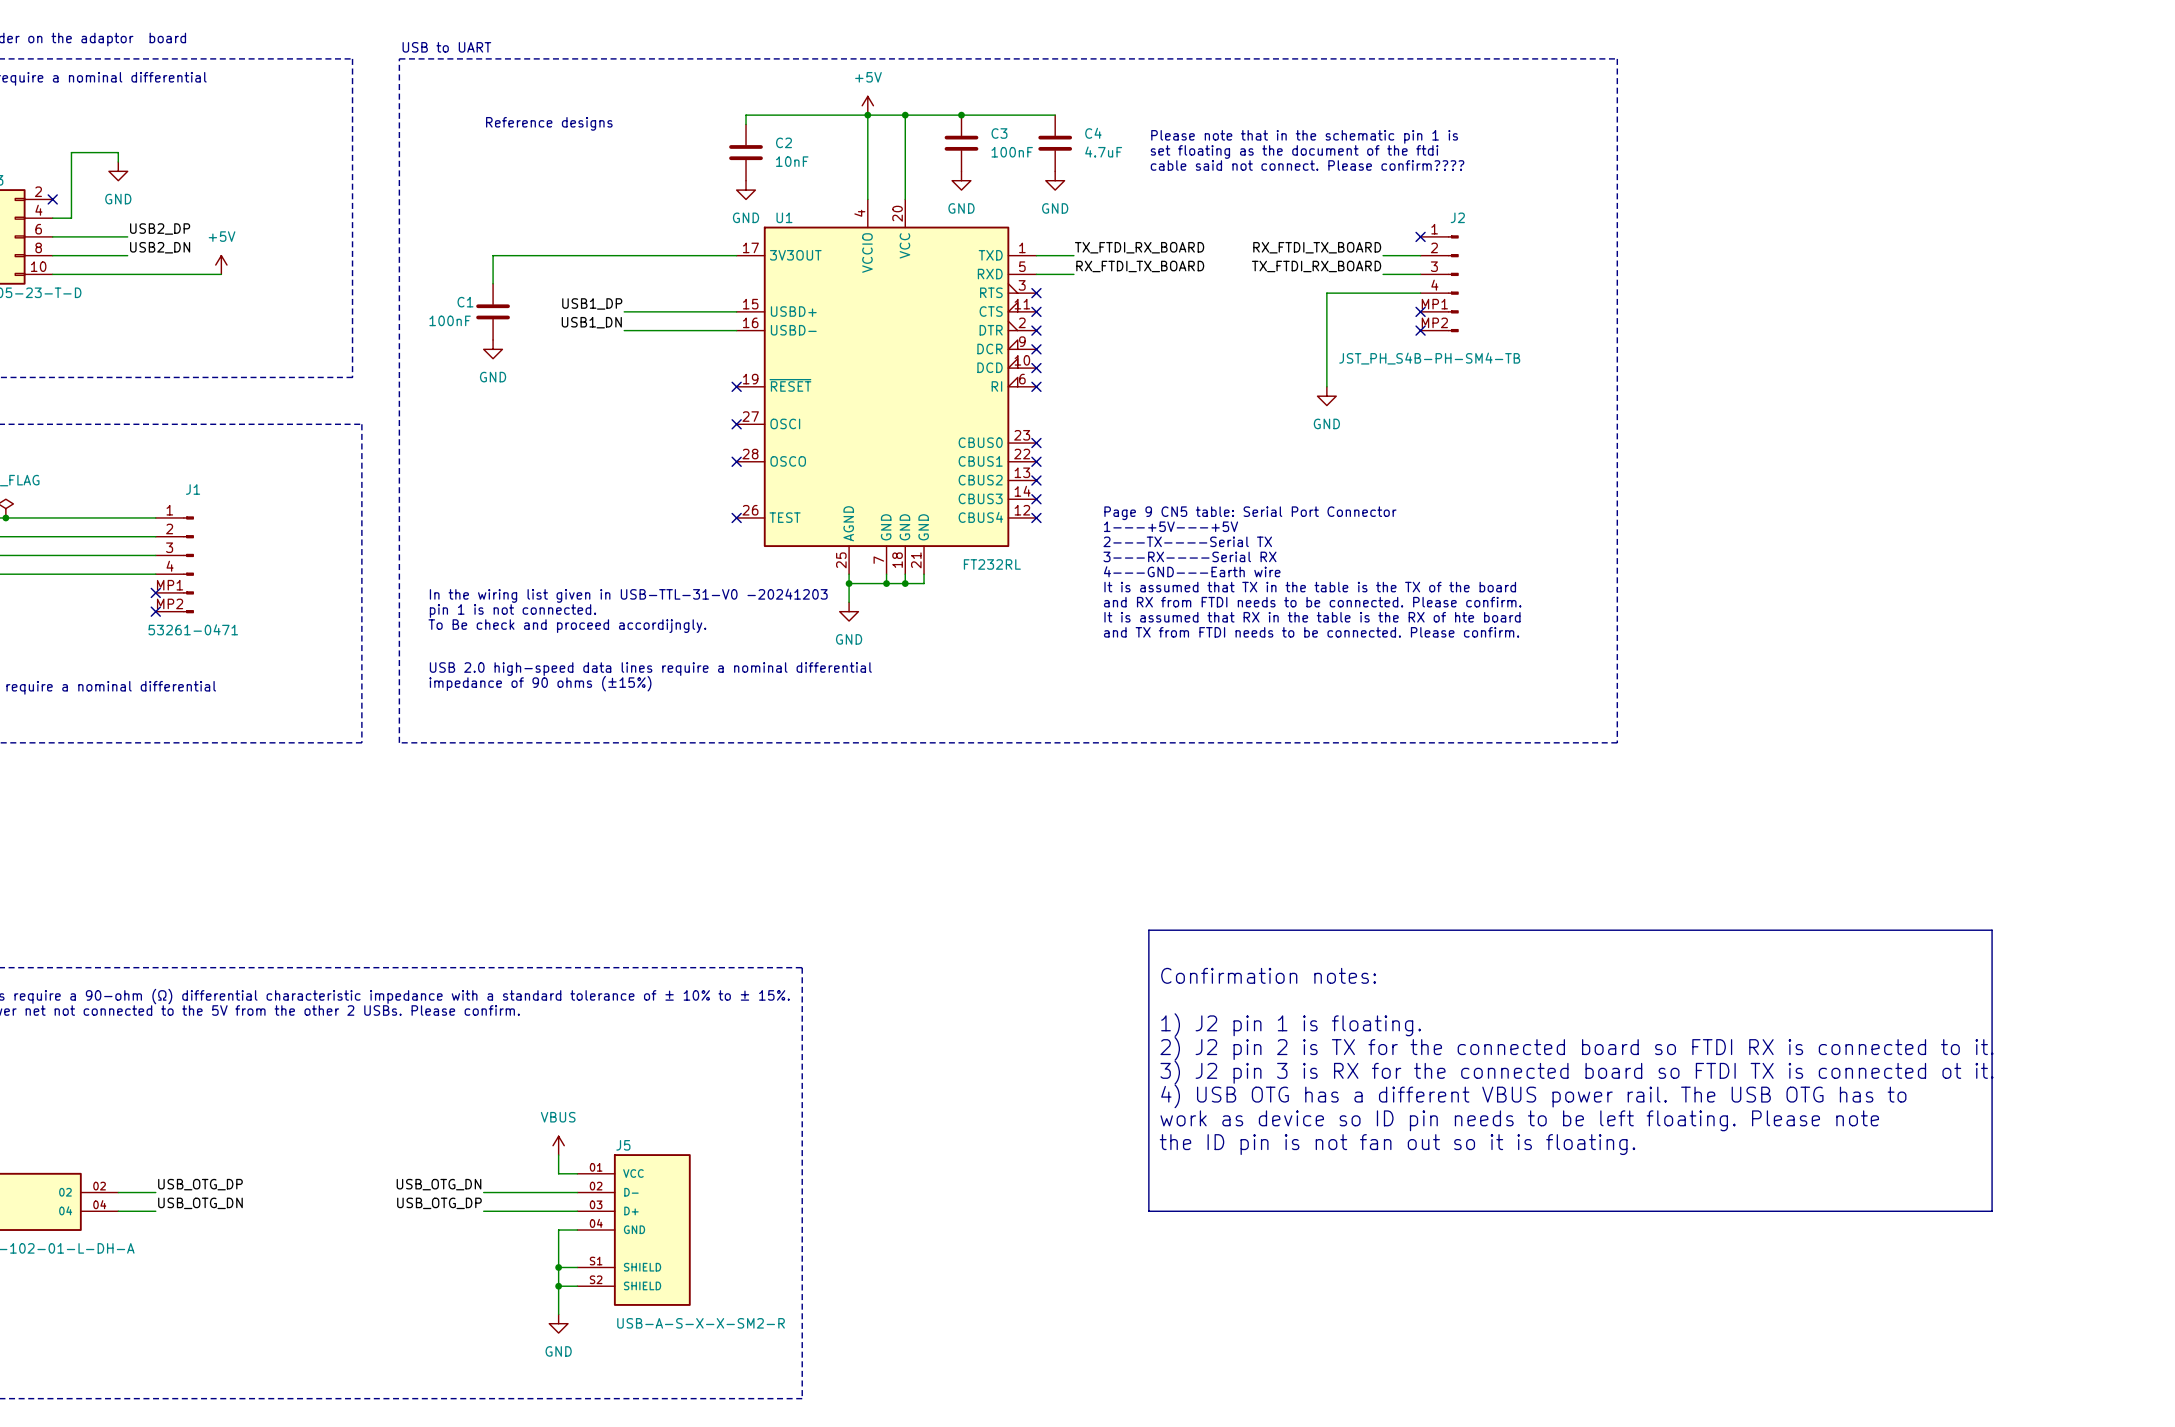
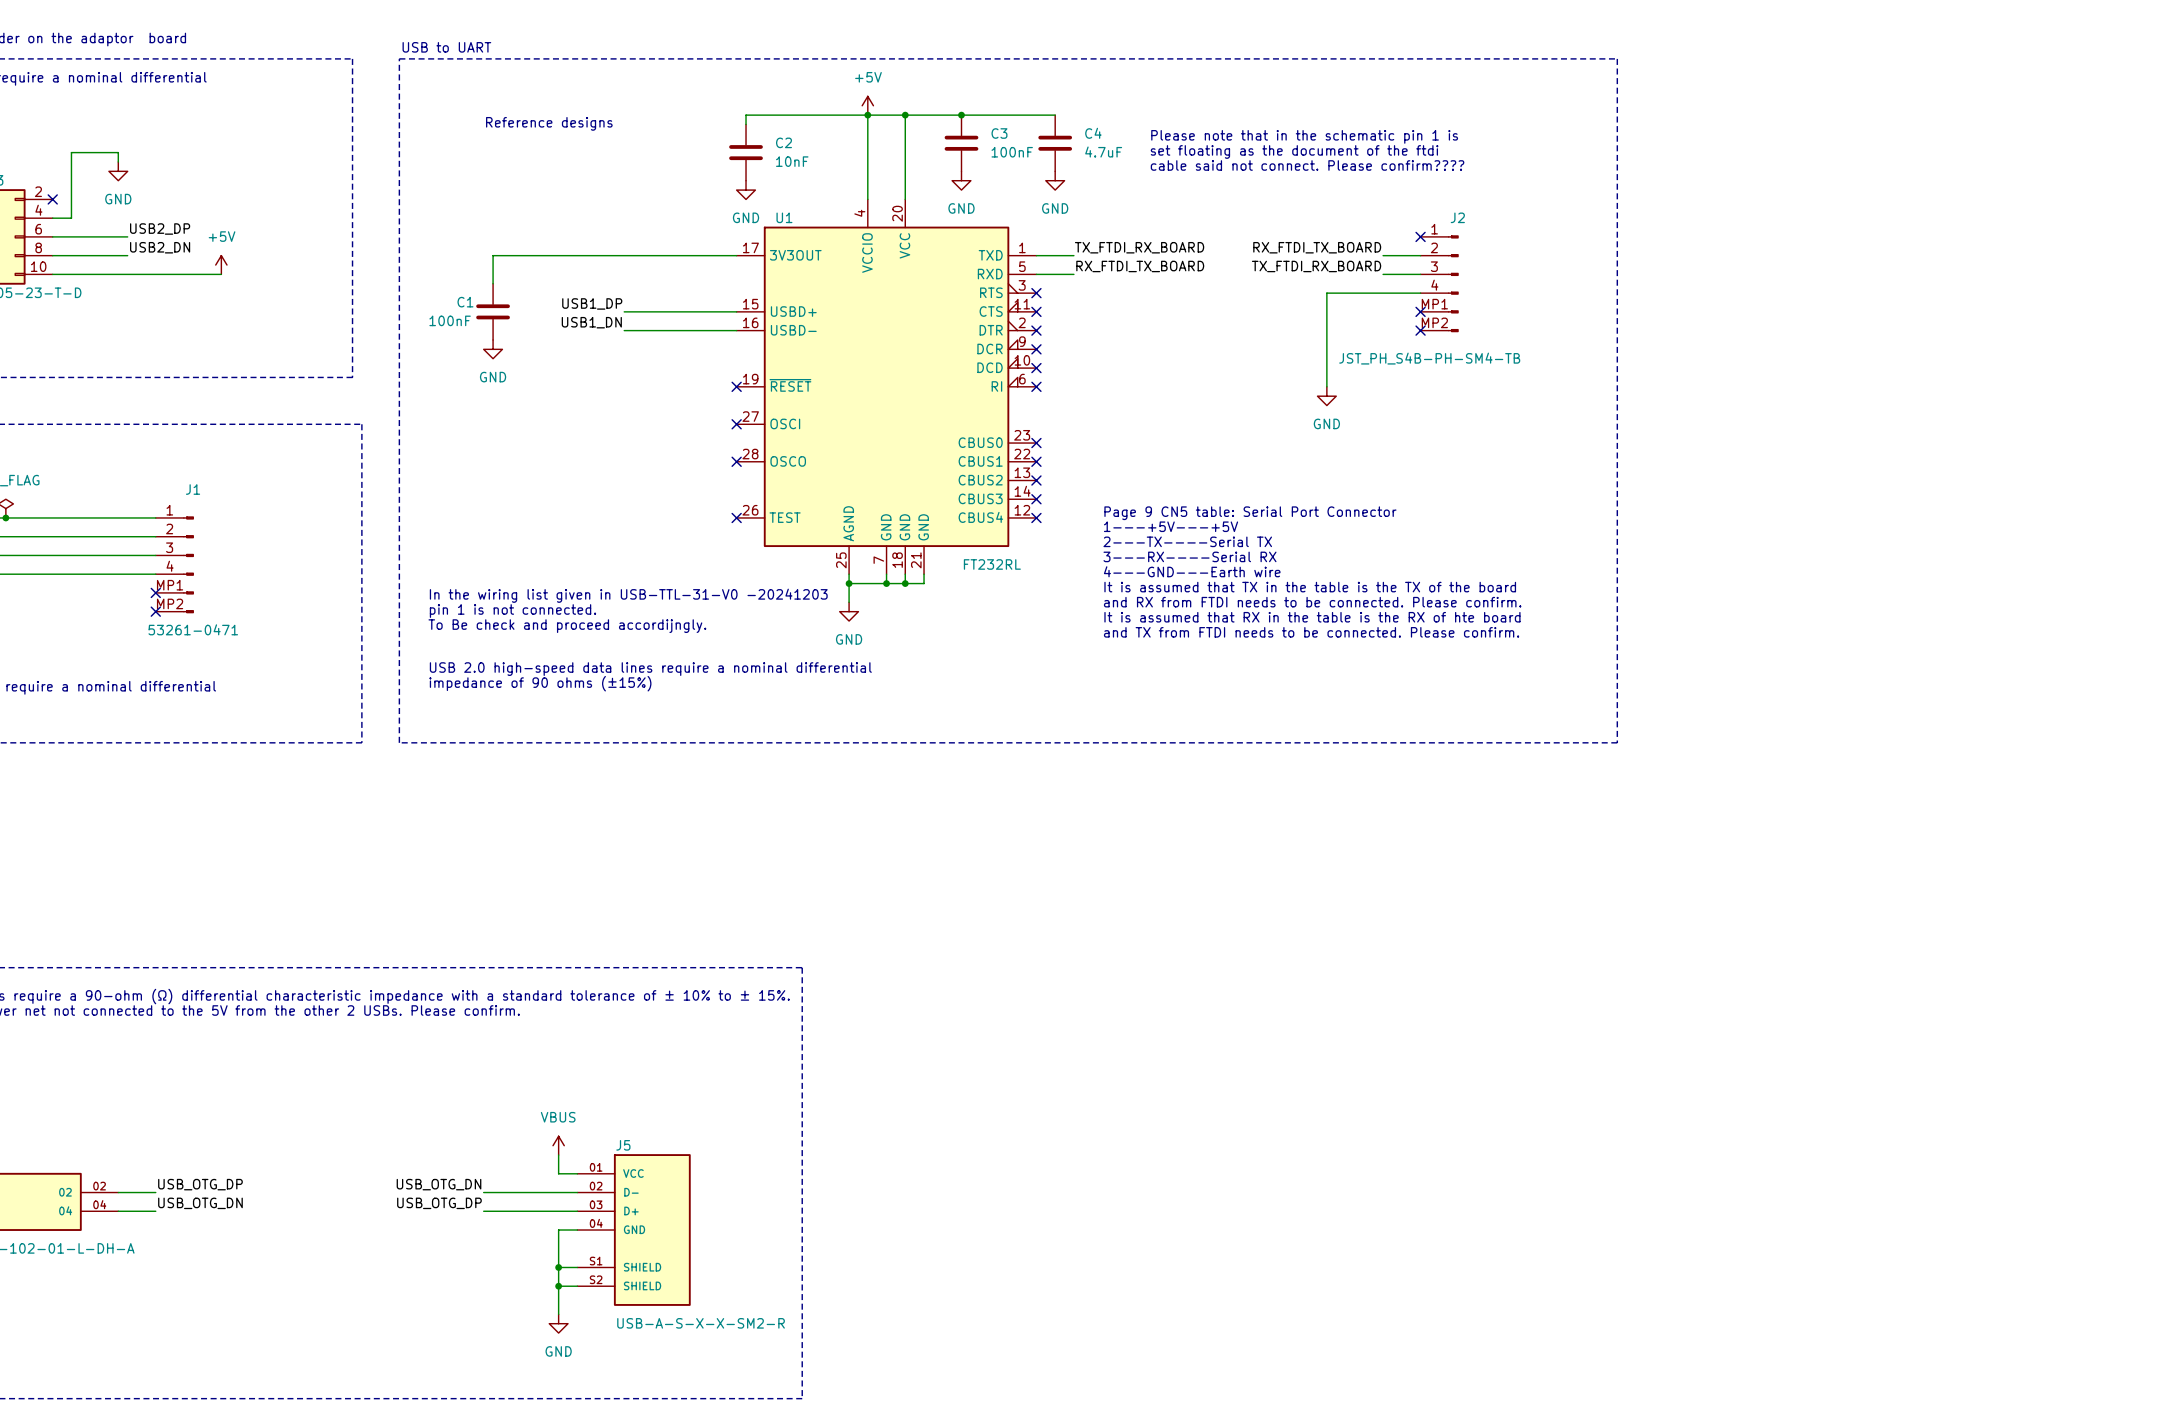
line: (1148, 930) (1992, 930) (1992, 1211) (1148, 1211) (1148, 930) -> none
text: Confirmation notes: (1268, 975) -> none
text: 1) J2 pin 1 is floating. (1291, 1025) -> none
text: 2) J2 pin 2 is TX for the connected board so FTDI RX is connected to it. (1577, 1048) -> none
text: 3) J2 pin 3 is RX for the connected board so FTDI TX is connected ot it. (1577, 1072) -> none
text: 4) USB OTG has a different VBUS power rail. The USB OTG has to (1533, 1096) -> none
text: work as device so ID pin needs to be left floating. Please note (1519, 1120) -> none
text: the ID pin is not fan out so it is floating. (1397, 1144) -> none

